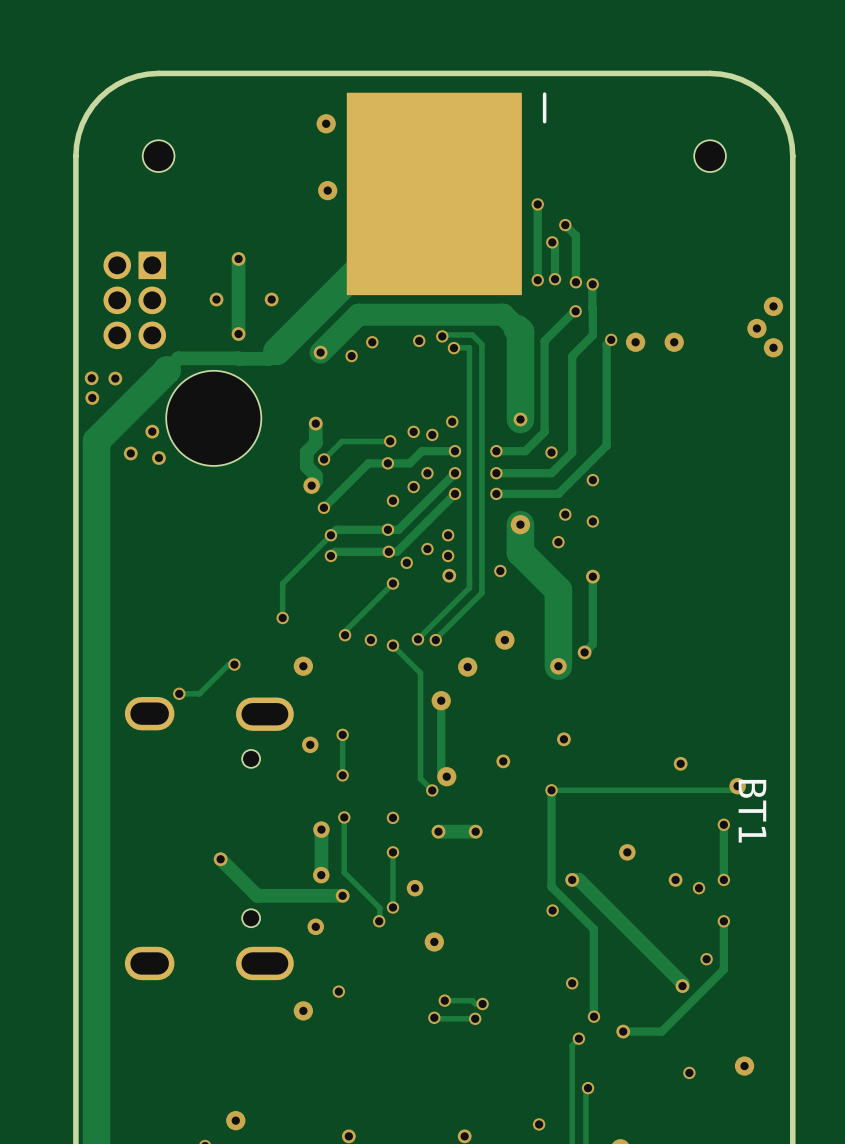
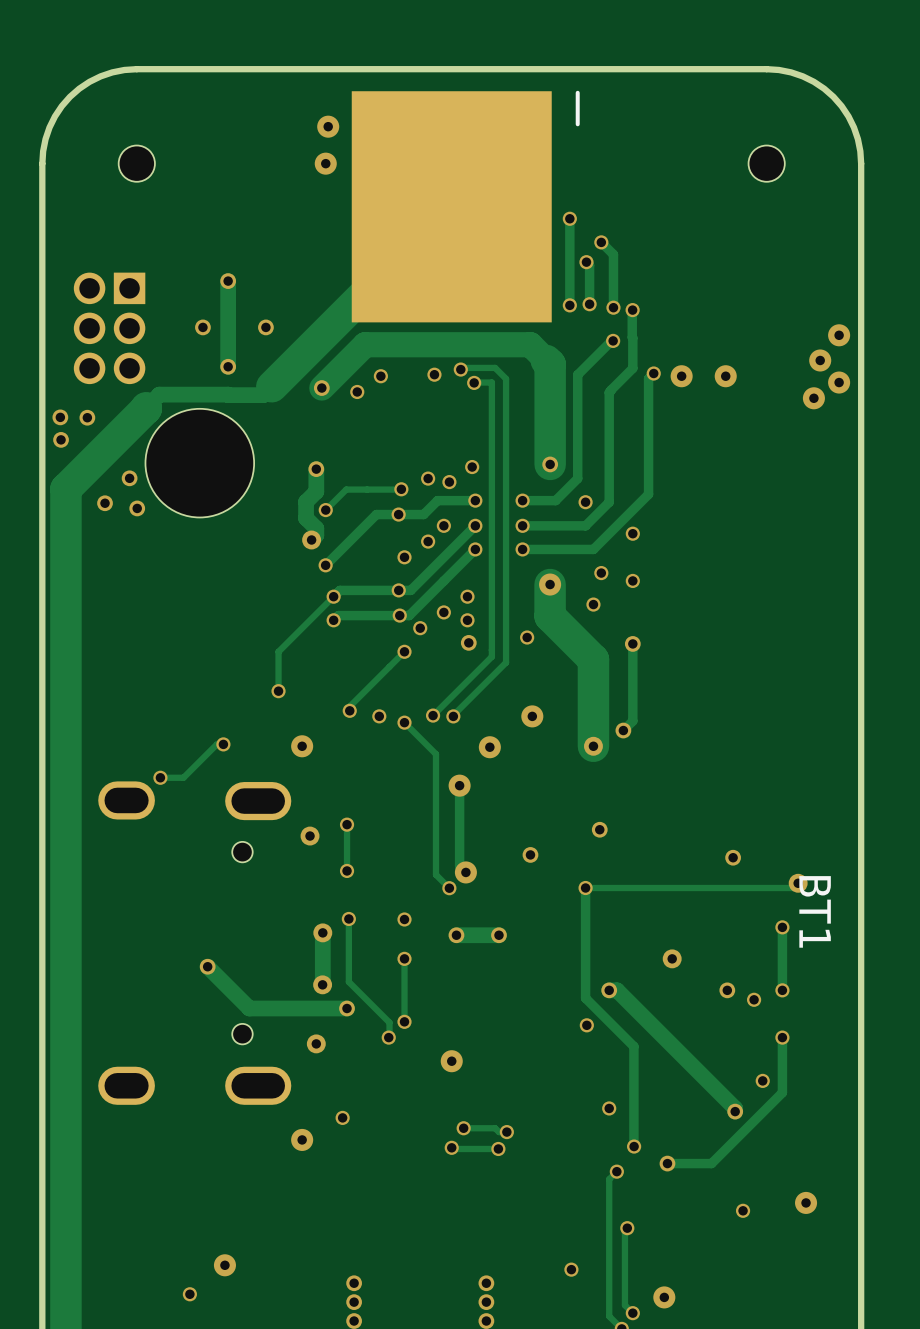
via position: (327, 190) -> (325, 163)
via: none -> (813, 398)
via: (415, 888) -> none

